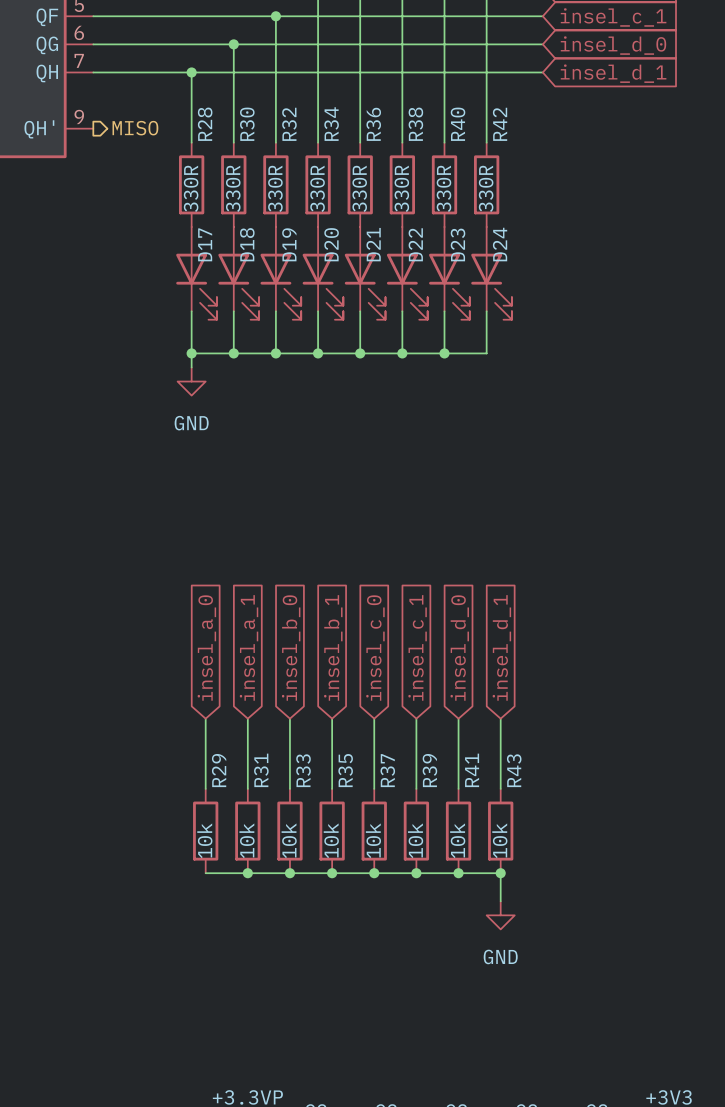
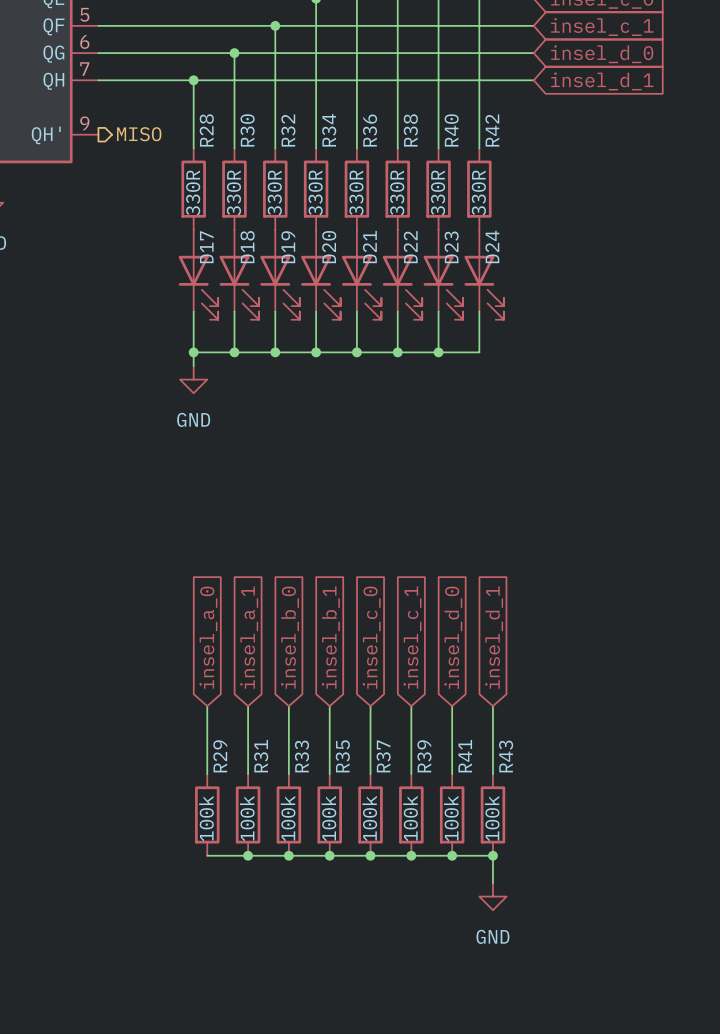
R29 value: 10k (204, 840) -> 100k (206, 818)
R31 value: 10k (247, 840) -> 100k (247, 818)
R33 value: 10k (289, 840) -> 100k (288, 818)
R35 value: 10k (331, 840) -> 100k (328, 818)
R37 value: 10k (373, 840) -> 100k (369, 818)
R39 value: 10k (415, 840) -> 100k (410, 818)
R41 value: 10k (457, 840) -> 100k (451, 818)
R43 value: 10k (499, 840) -> 100k (492, 818)

